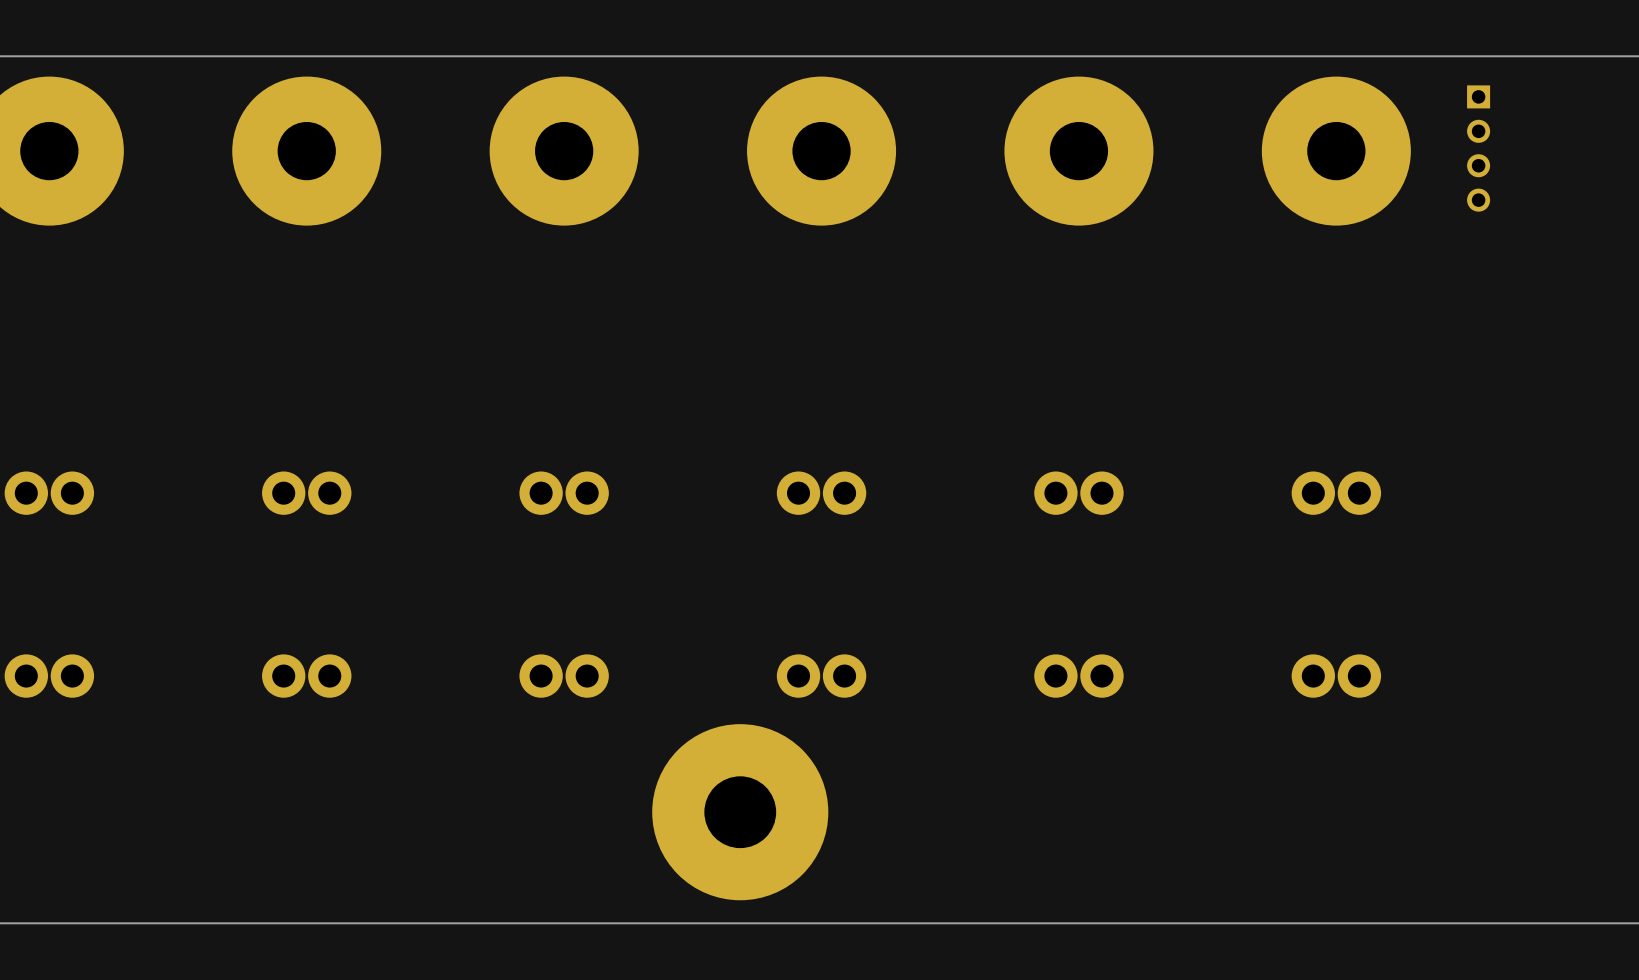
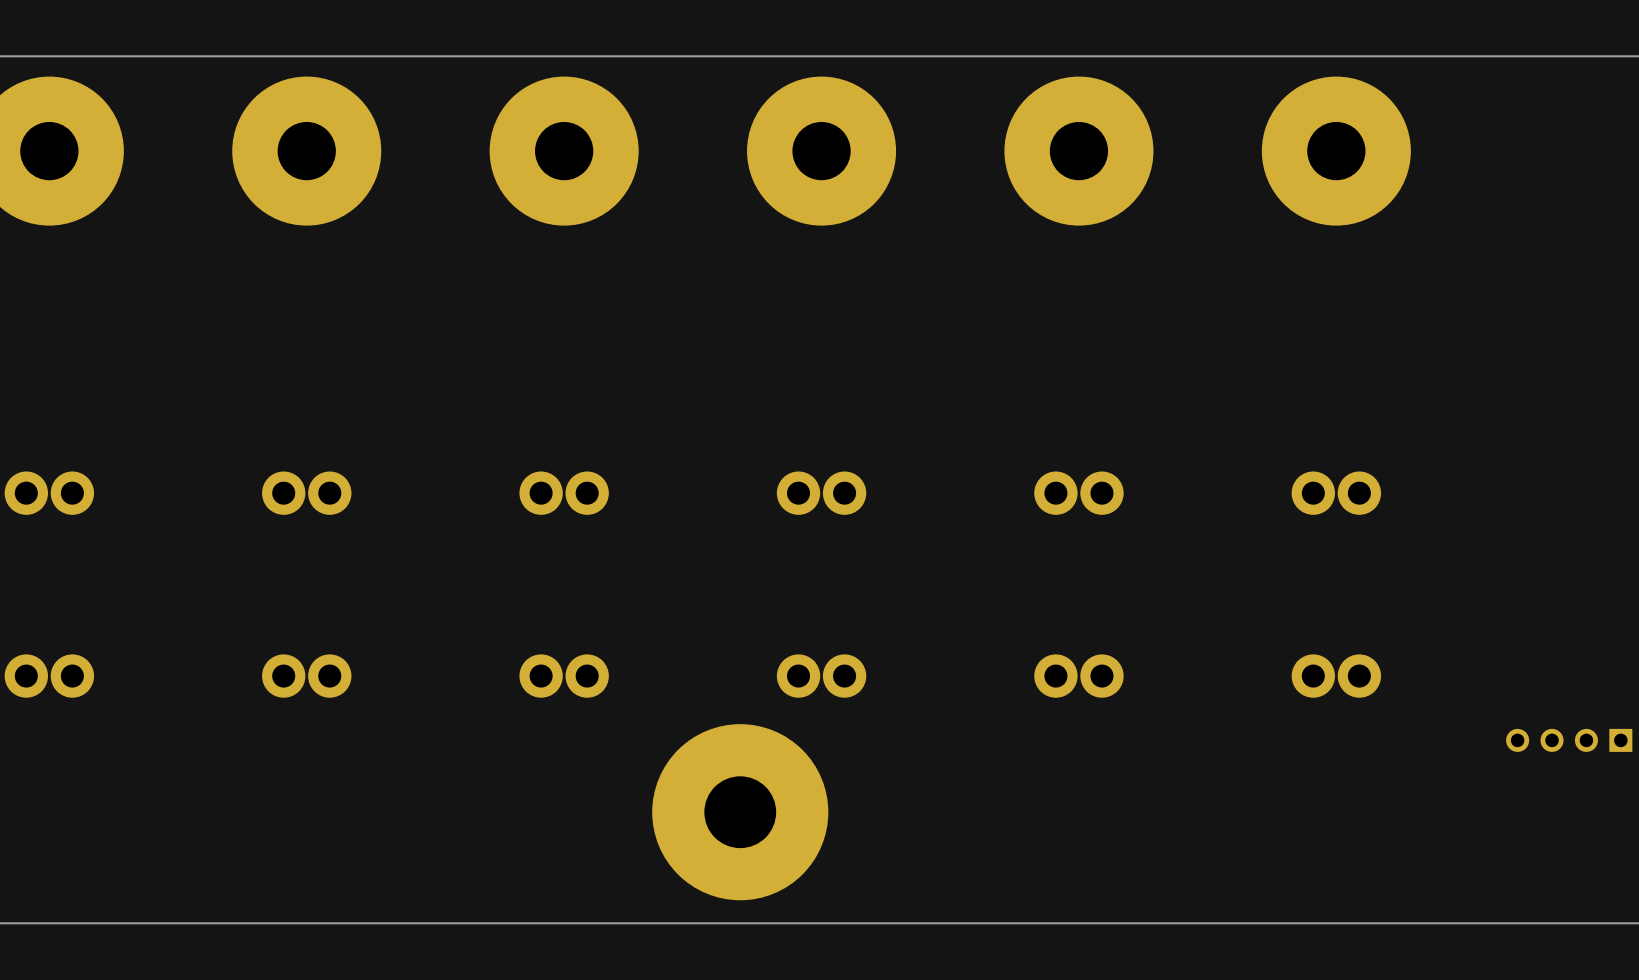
part: (1478, 148) -> none
part: none -> (1569, 740)

